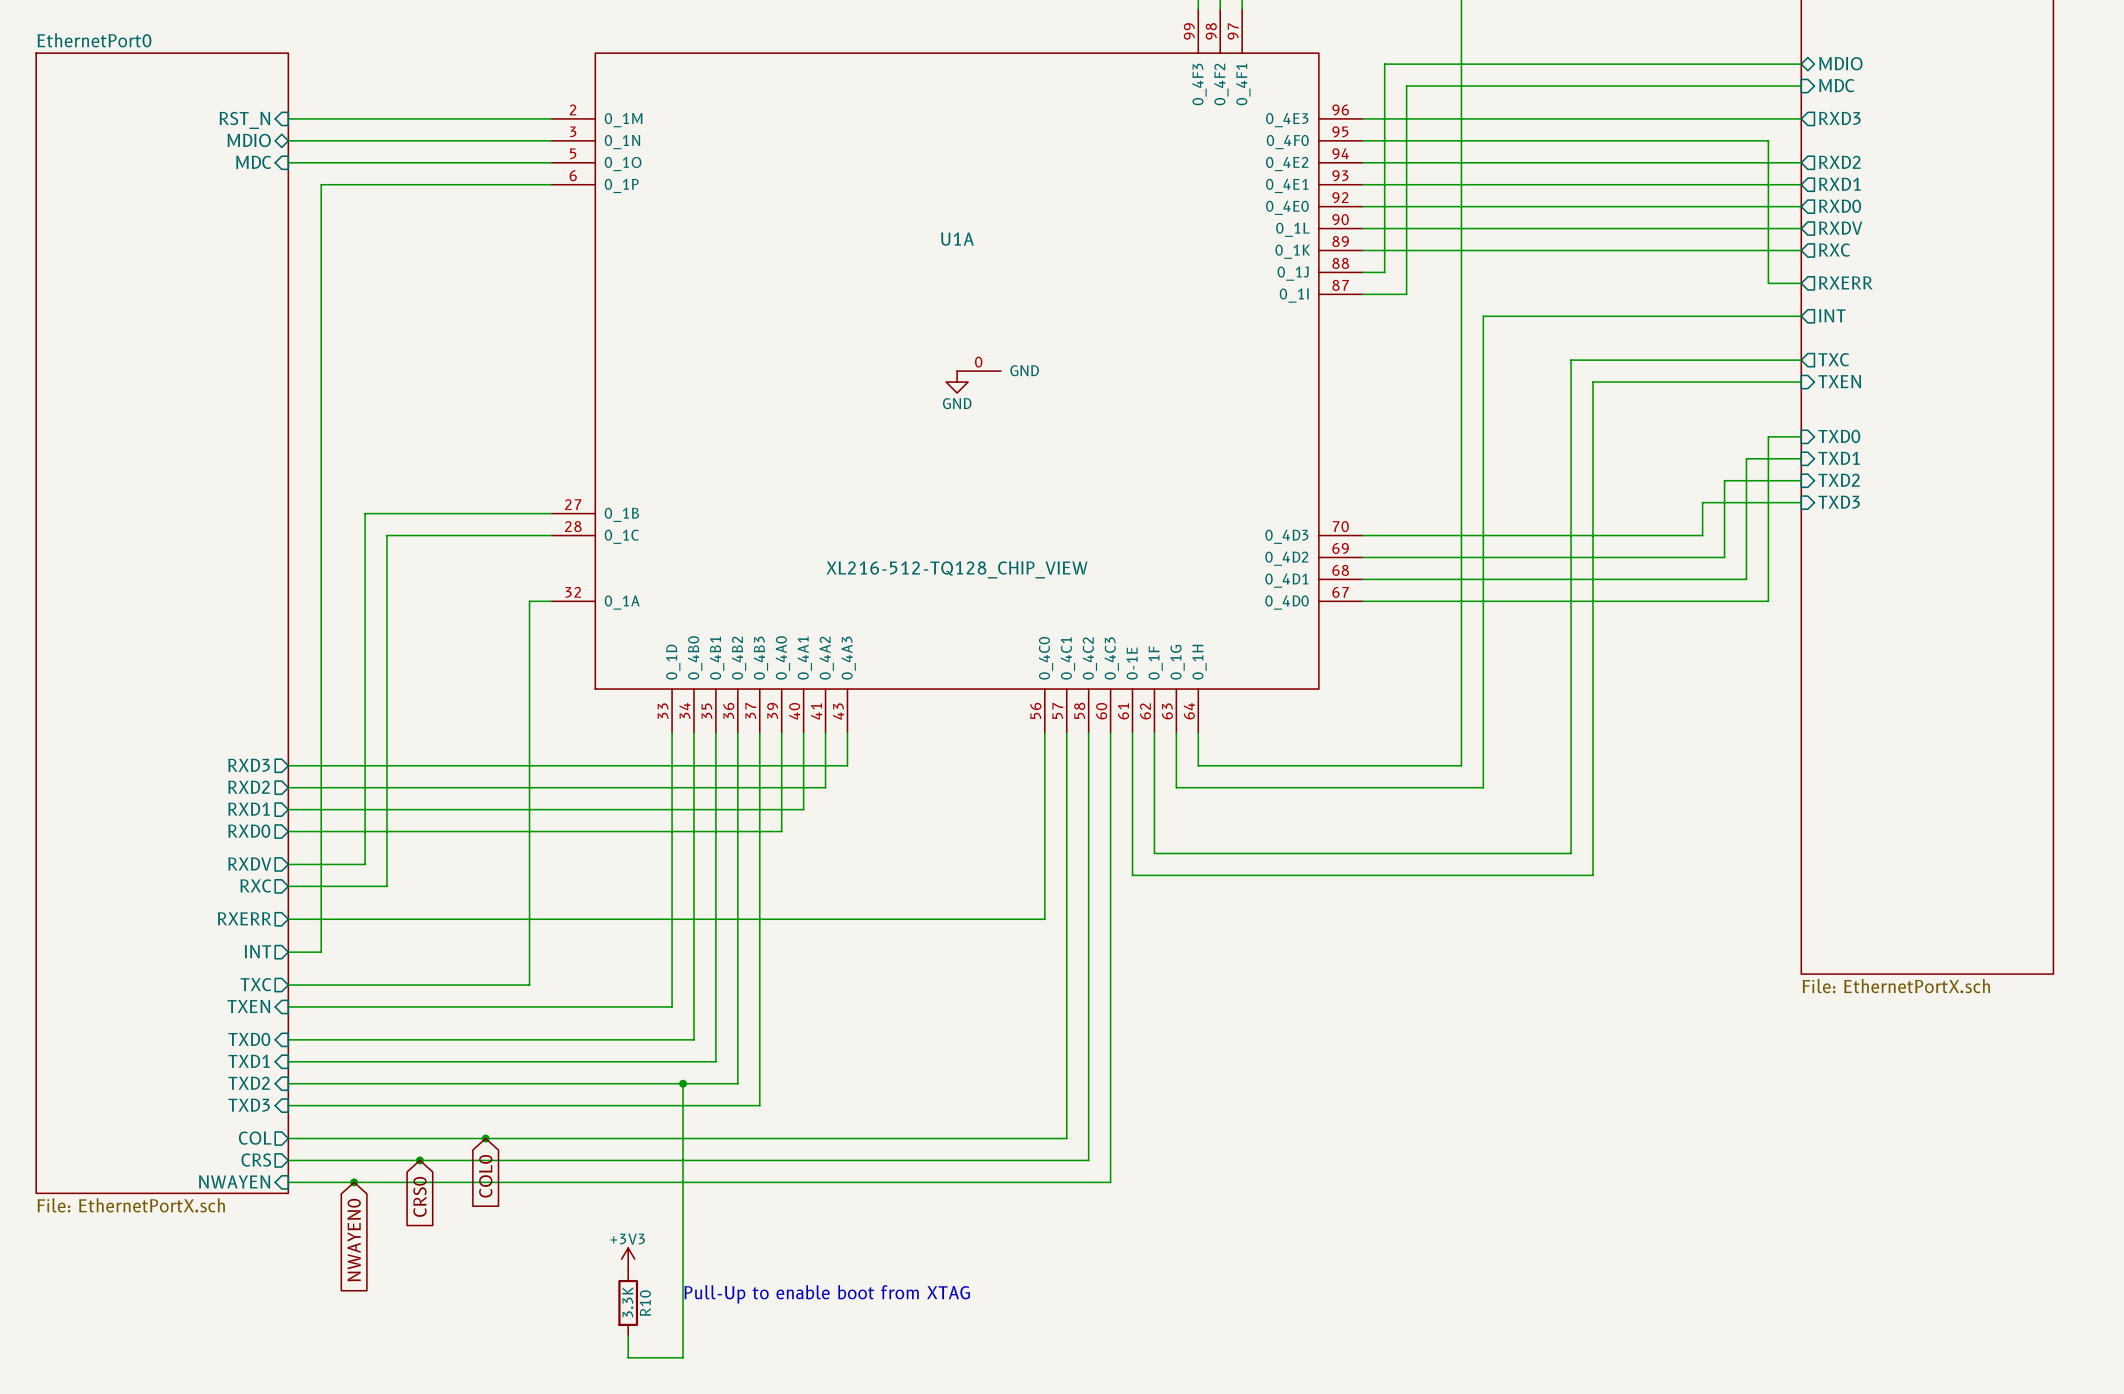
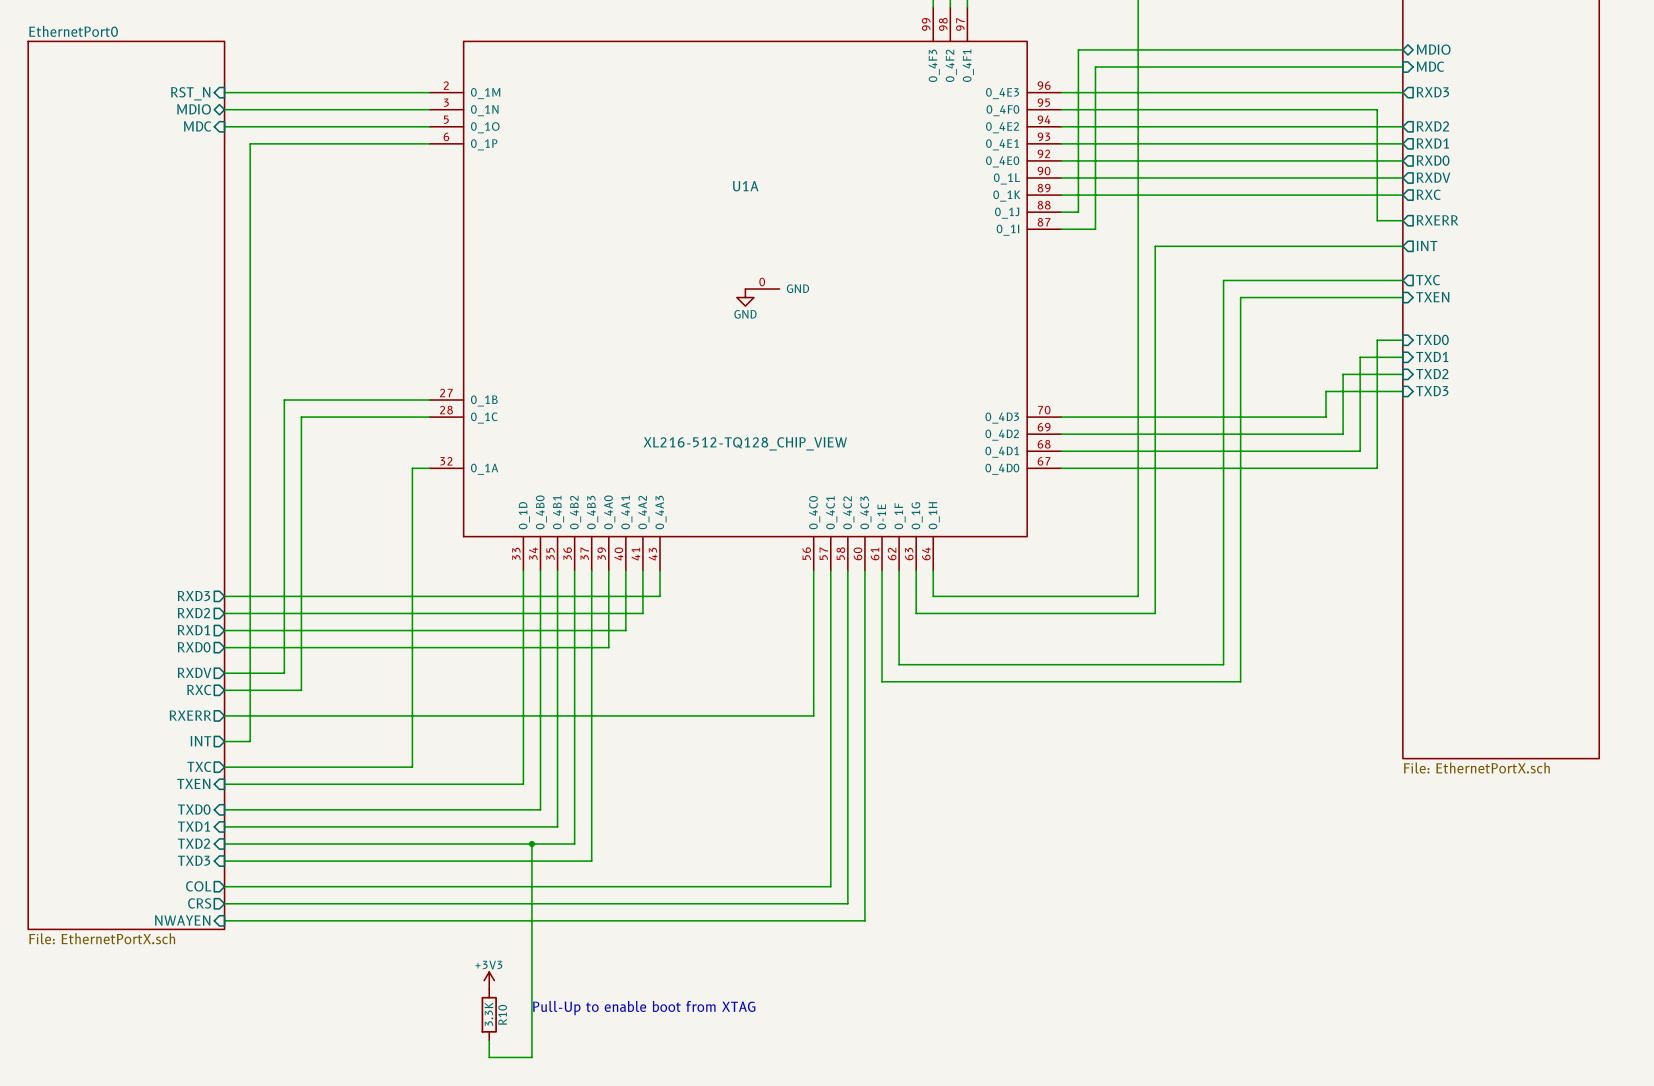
junction: (485, 1138) -> none
junction: (419, 1160) -> none
global label: COL0 (485, 1176) -> none
junction: (354, 1182) -> none
global label: CRS0 (419, 1196) -> none
global label: NWAYEN0 (354, 1240) -> none

